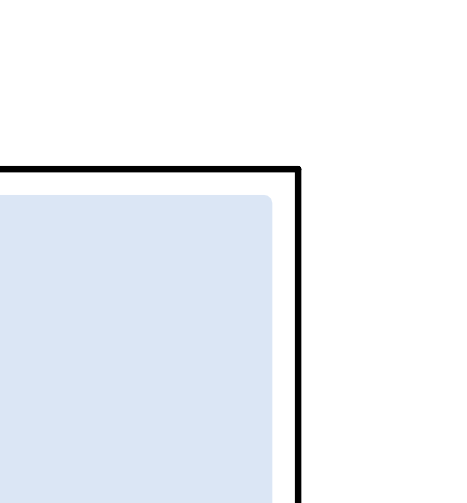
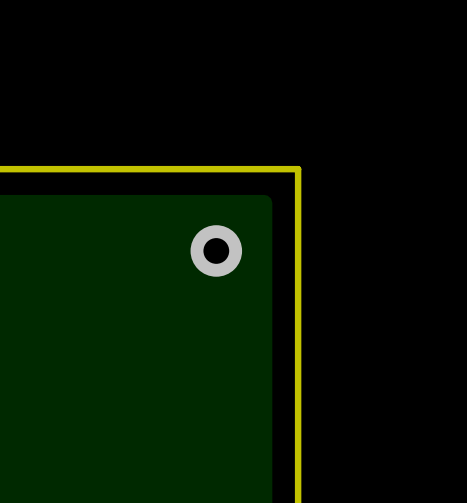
via: none -> (216, 250)

